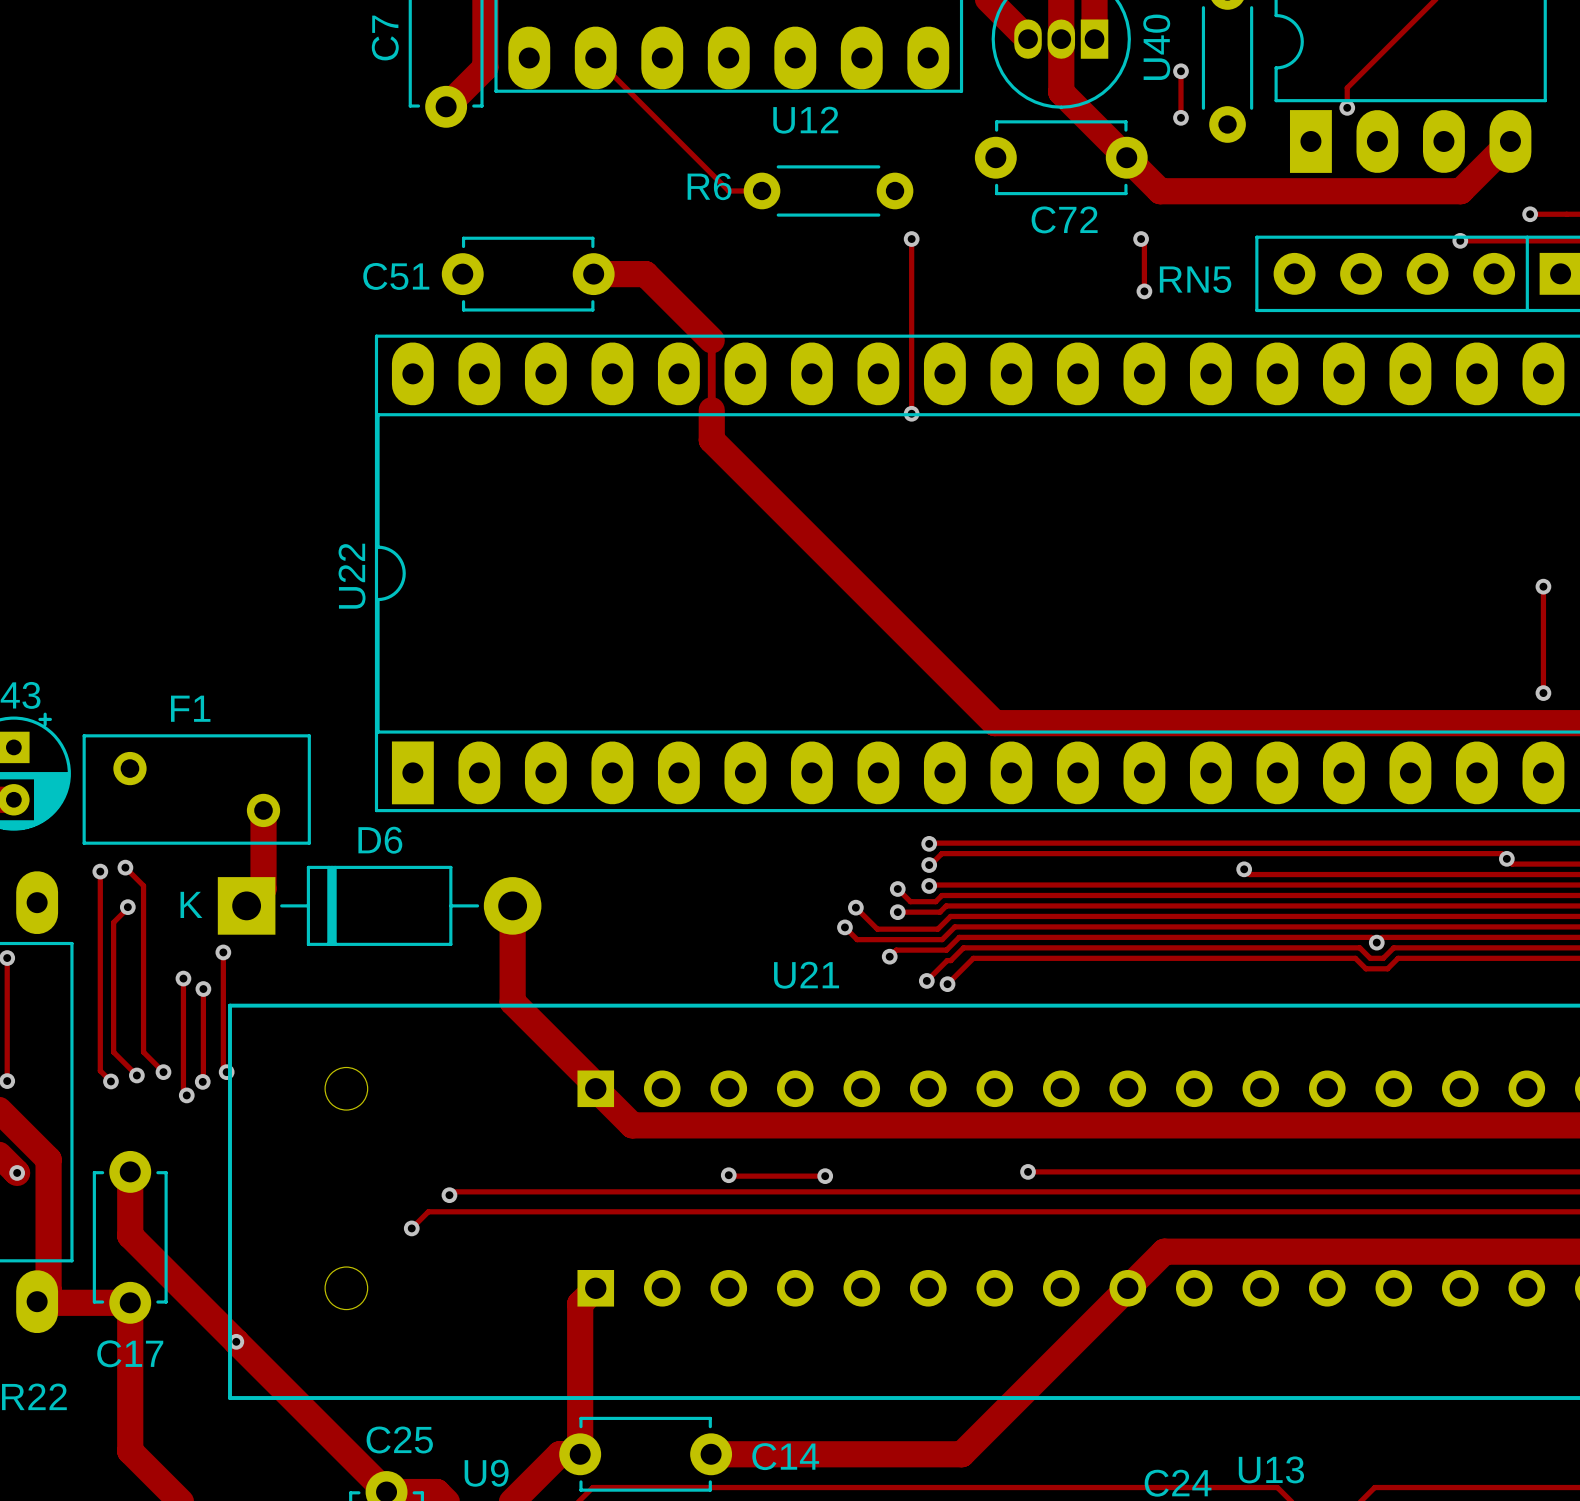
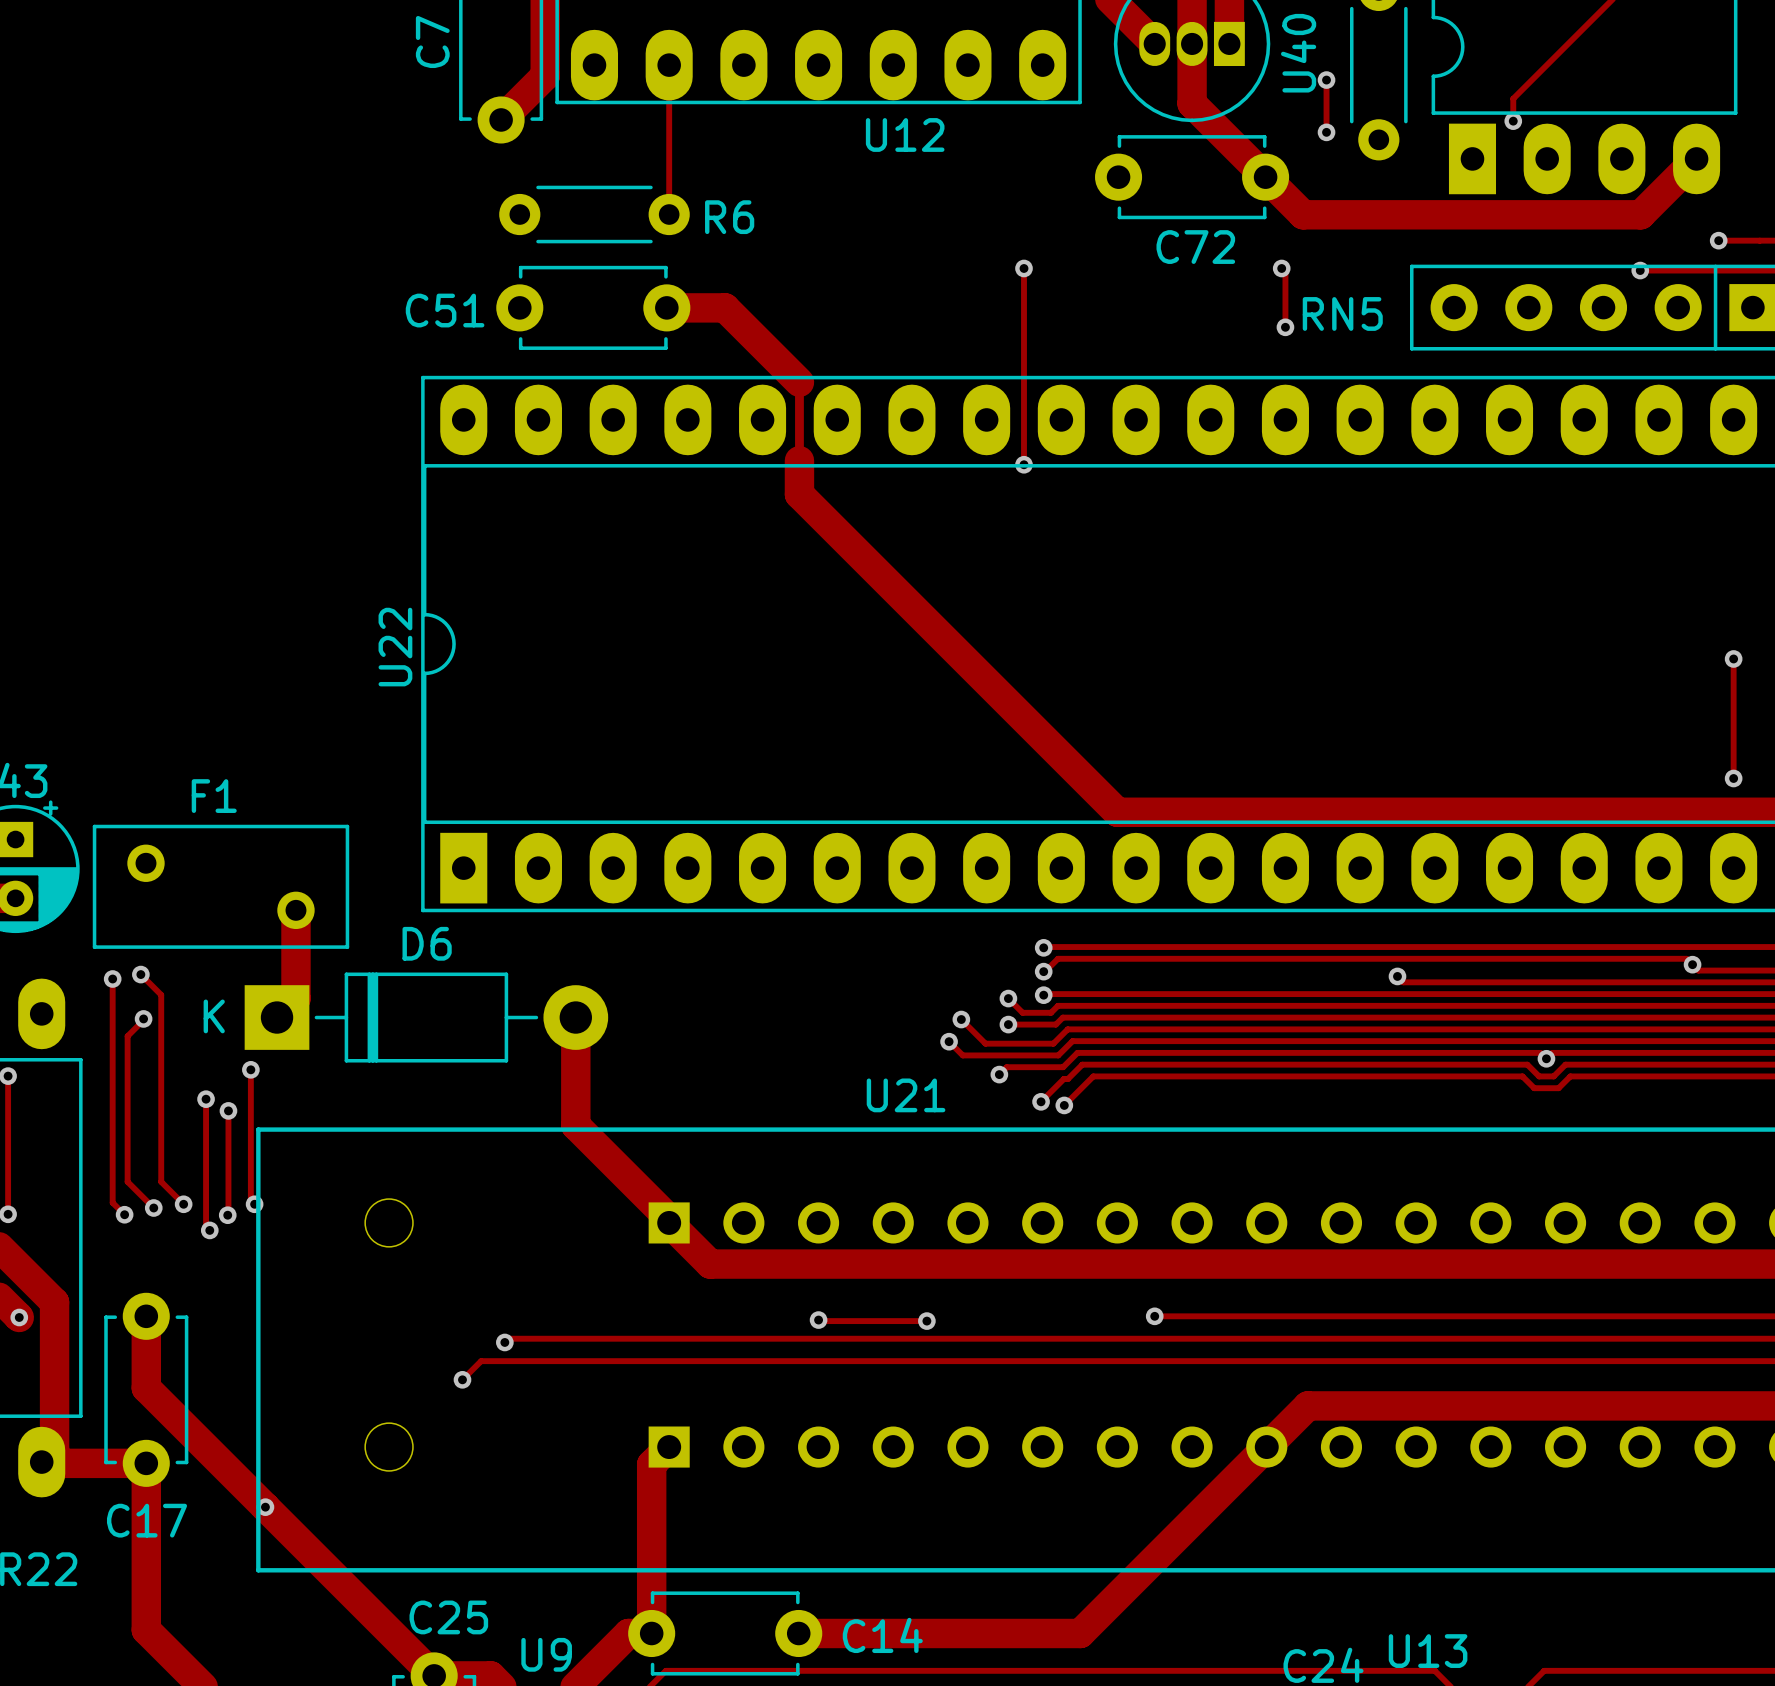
track: (595, 57) (728, 190) (762, 190) -> (669, 65) (669, 214)
R6 name position: R6 (709, 186) -> R6 (729, 217)
R6 position: (828, 190) -> (594, 214)

